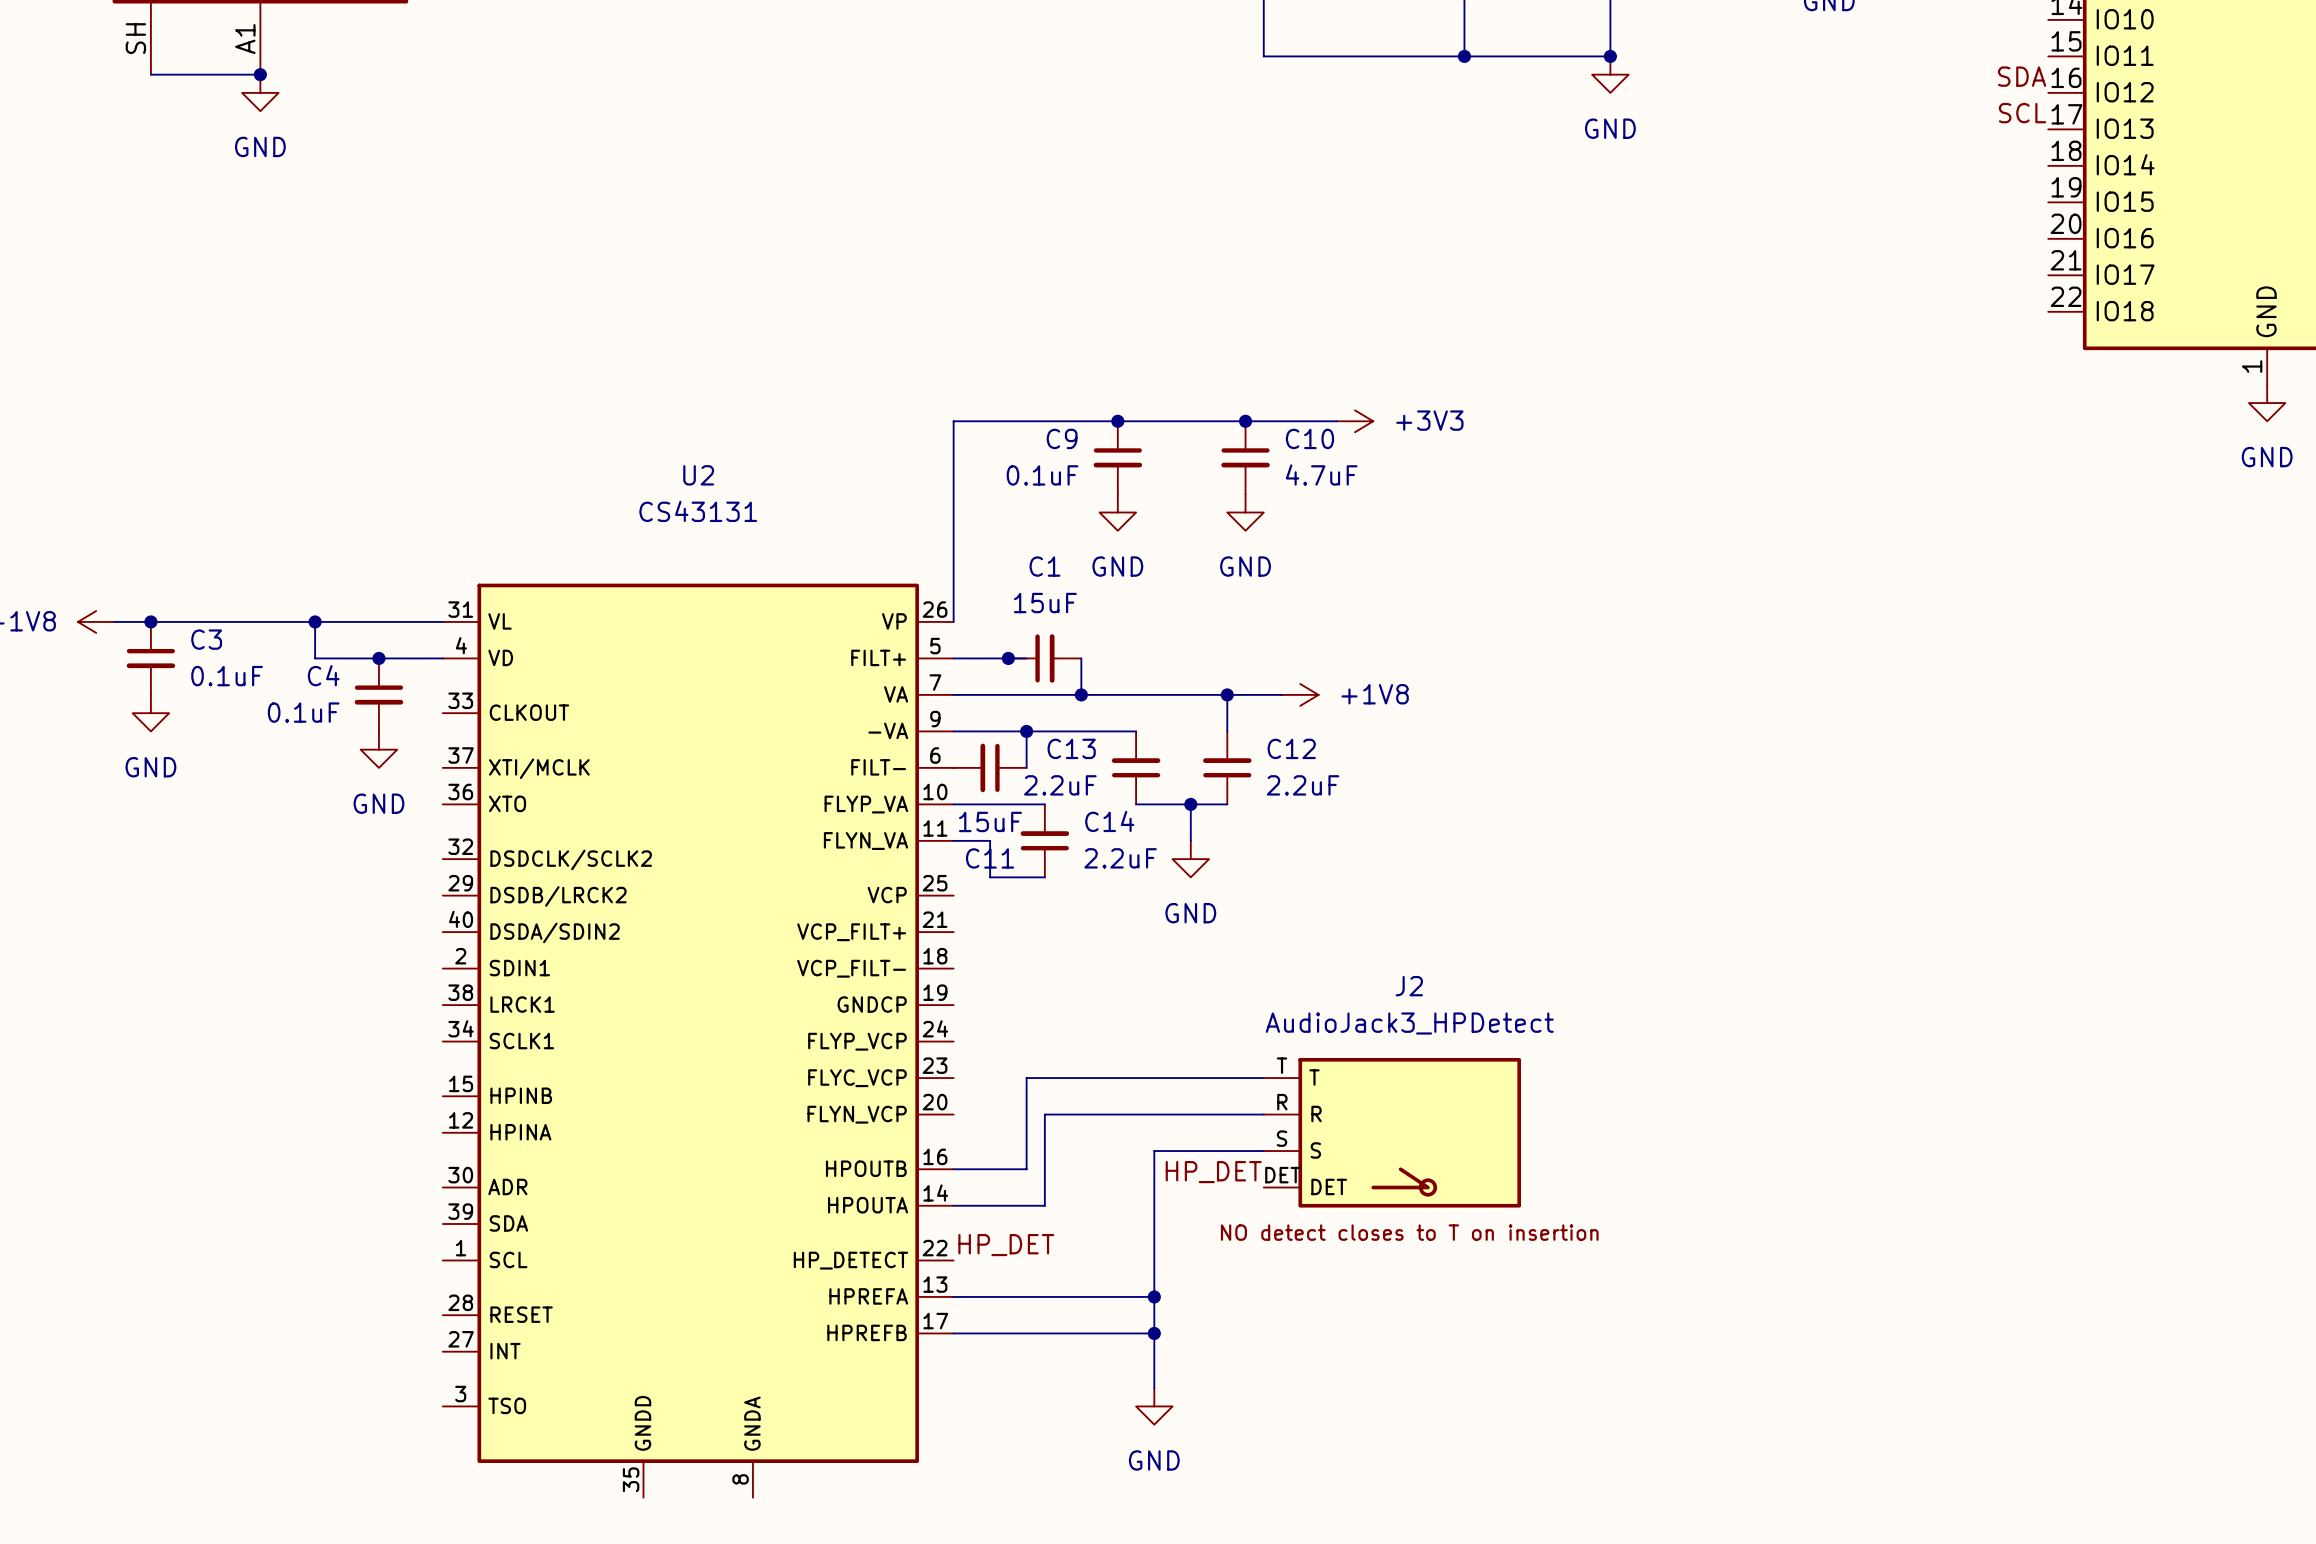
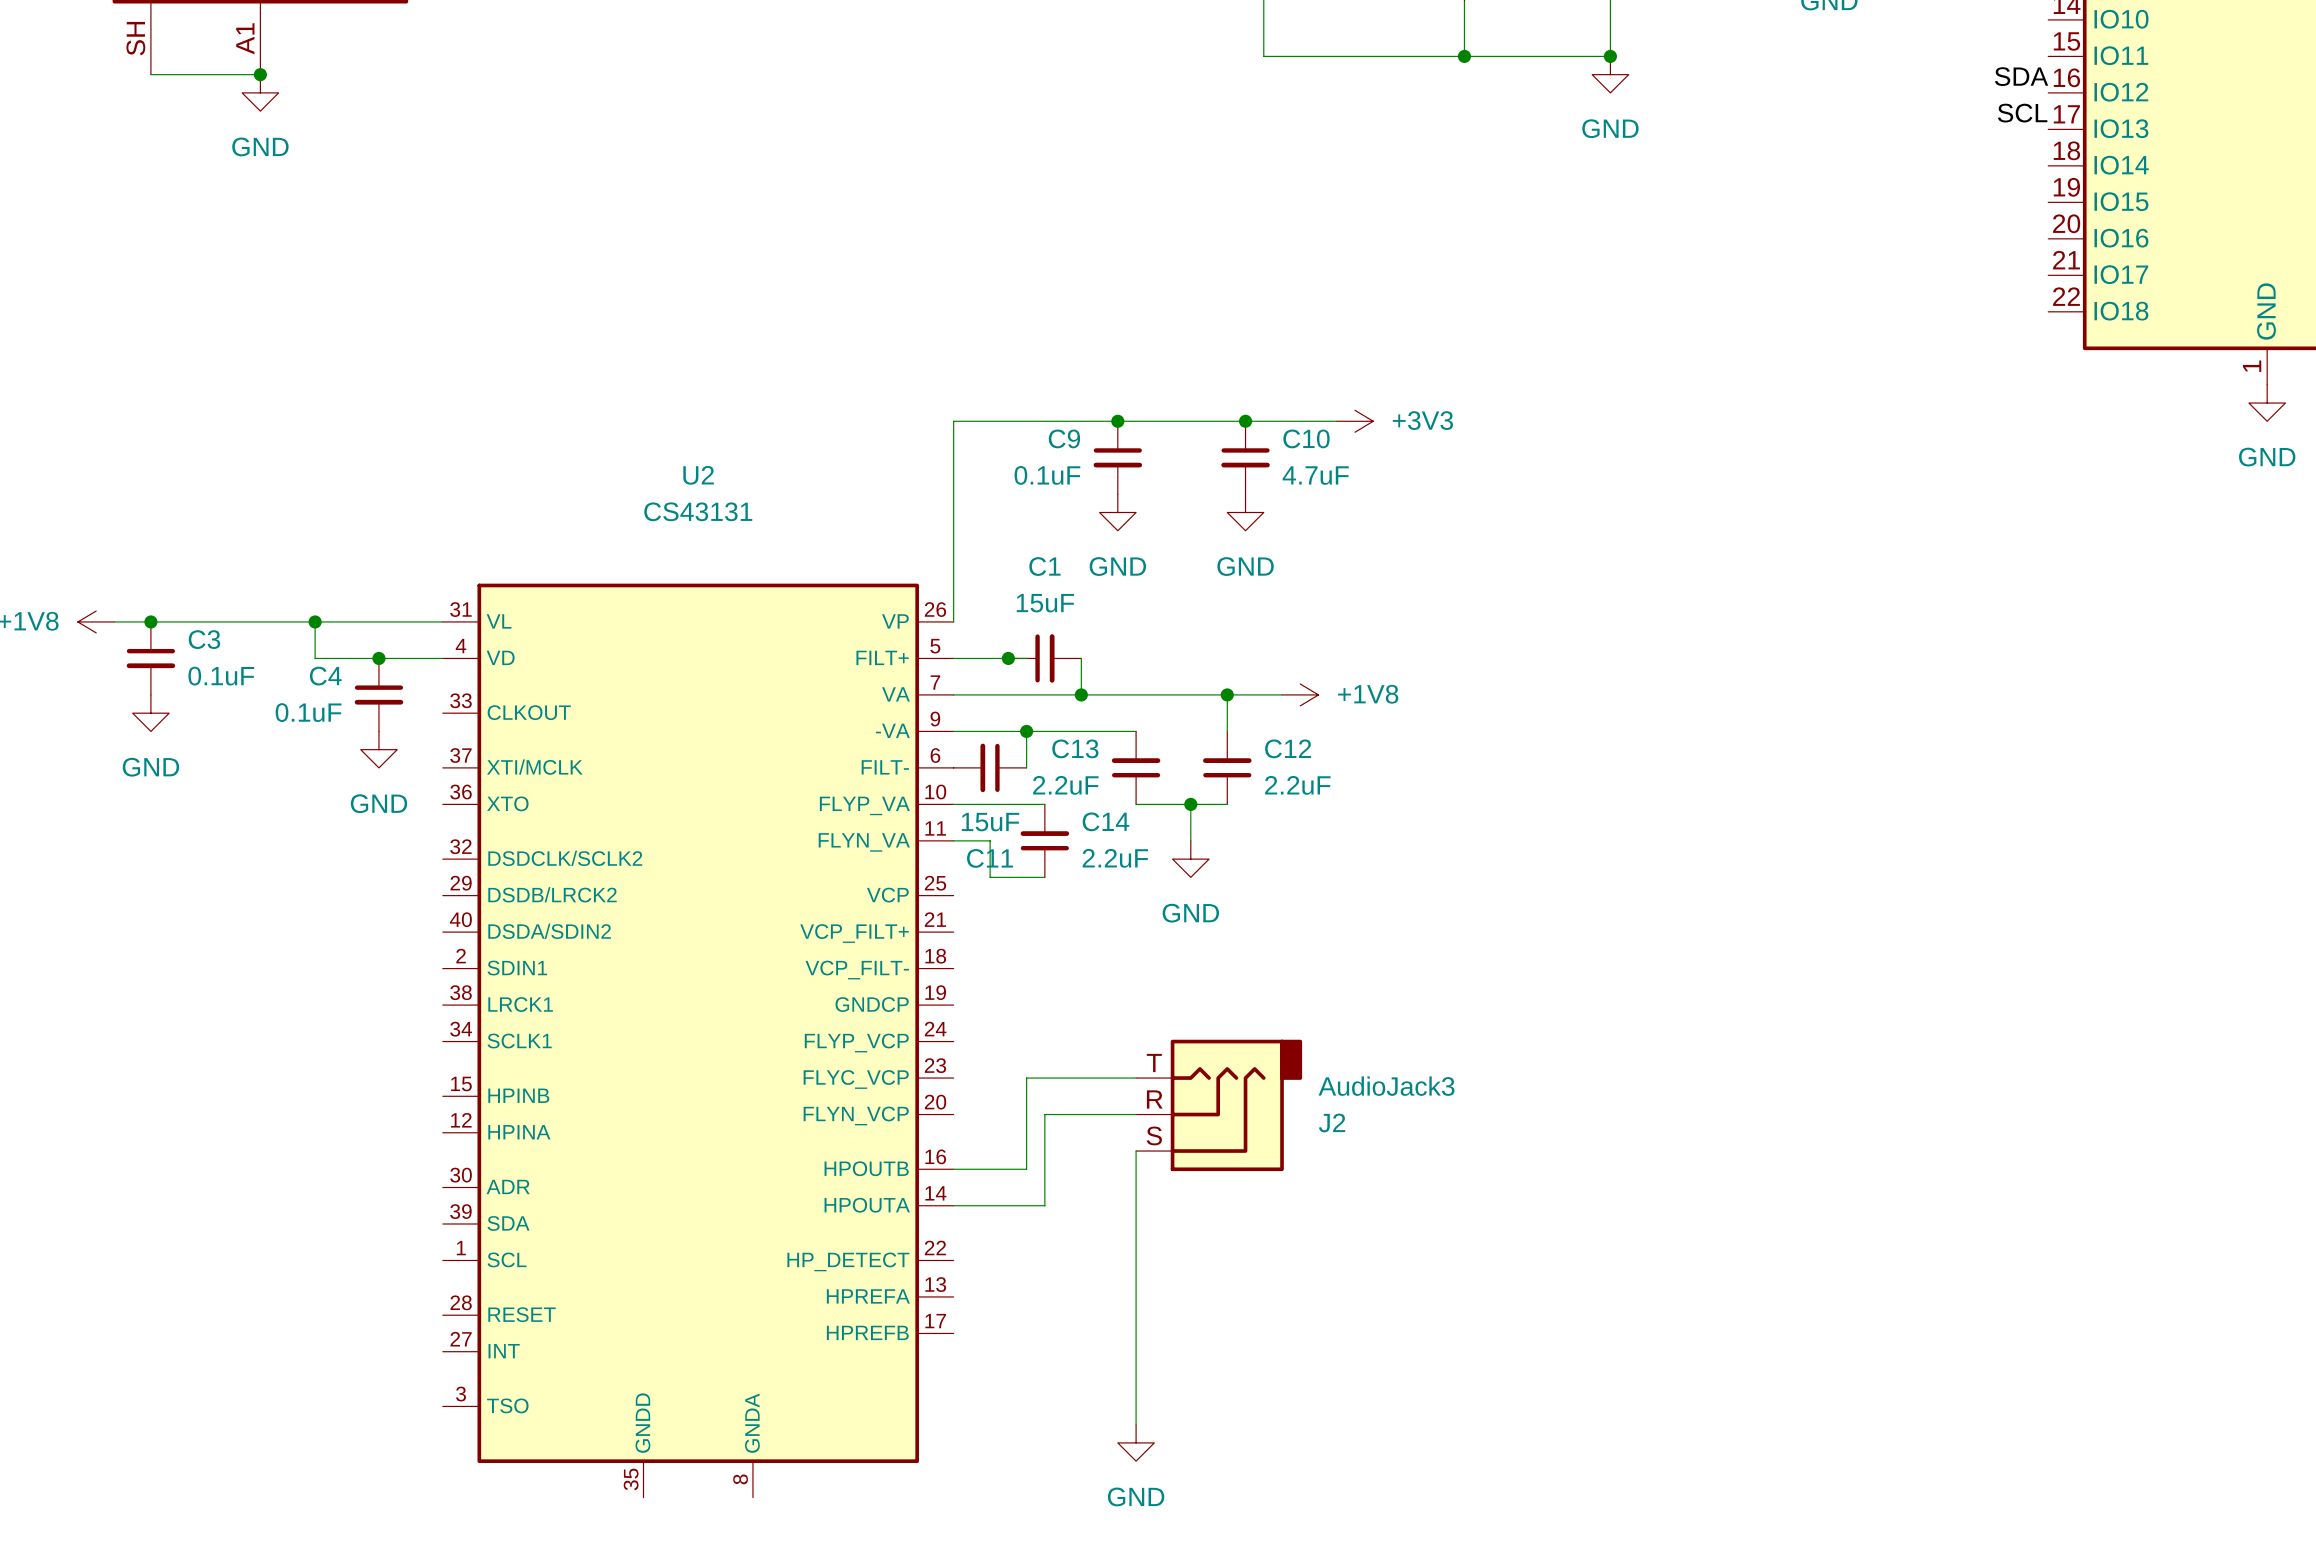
J2 name position: J2 (1409, 986) -> J2 (1332, 1122)
J2 value: AudioJack3_HPDetect (1409, 1023) -> AudioJack3 (1386, 1086)
J2 symbol: [1263, 1057, 1522, 1208] -> [1136, 1039, 1303, 1172]
wire: none -> (1136, 1151) (1136, 1424)
wire: (1263, 1151) (1154, 1151) (1154, 1388) -> none
label: HP_DET (1213, 1172) -> none
label: HP_DET (1006, 1245) -> none
wire: (953, 1296) (1154, 1296) -> none
junction: (1154, 1296) -> none
wire: (953, 1333) (1154, 1333) -> none
junction: (1154, 1333) -> none
power symbol position: GND (1154, 1406) -> GND (1136, 1442)

